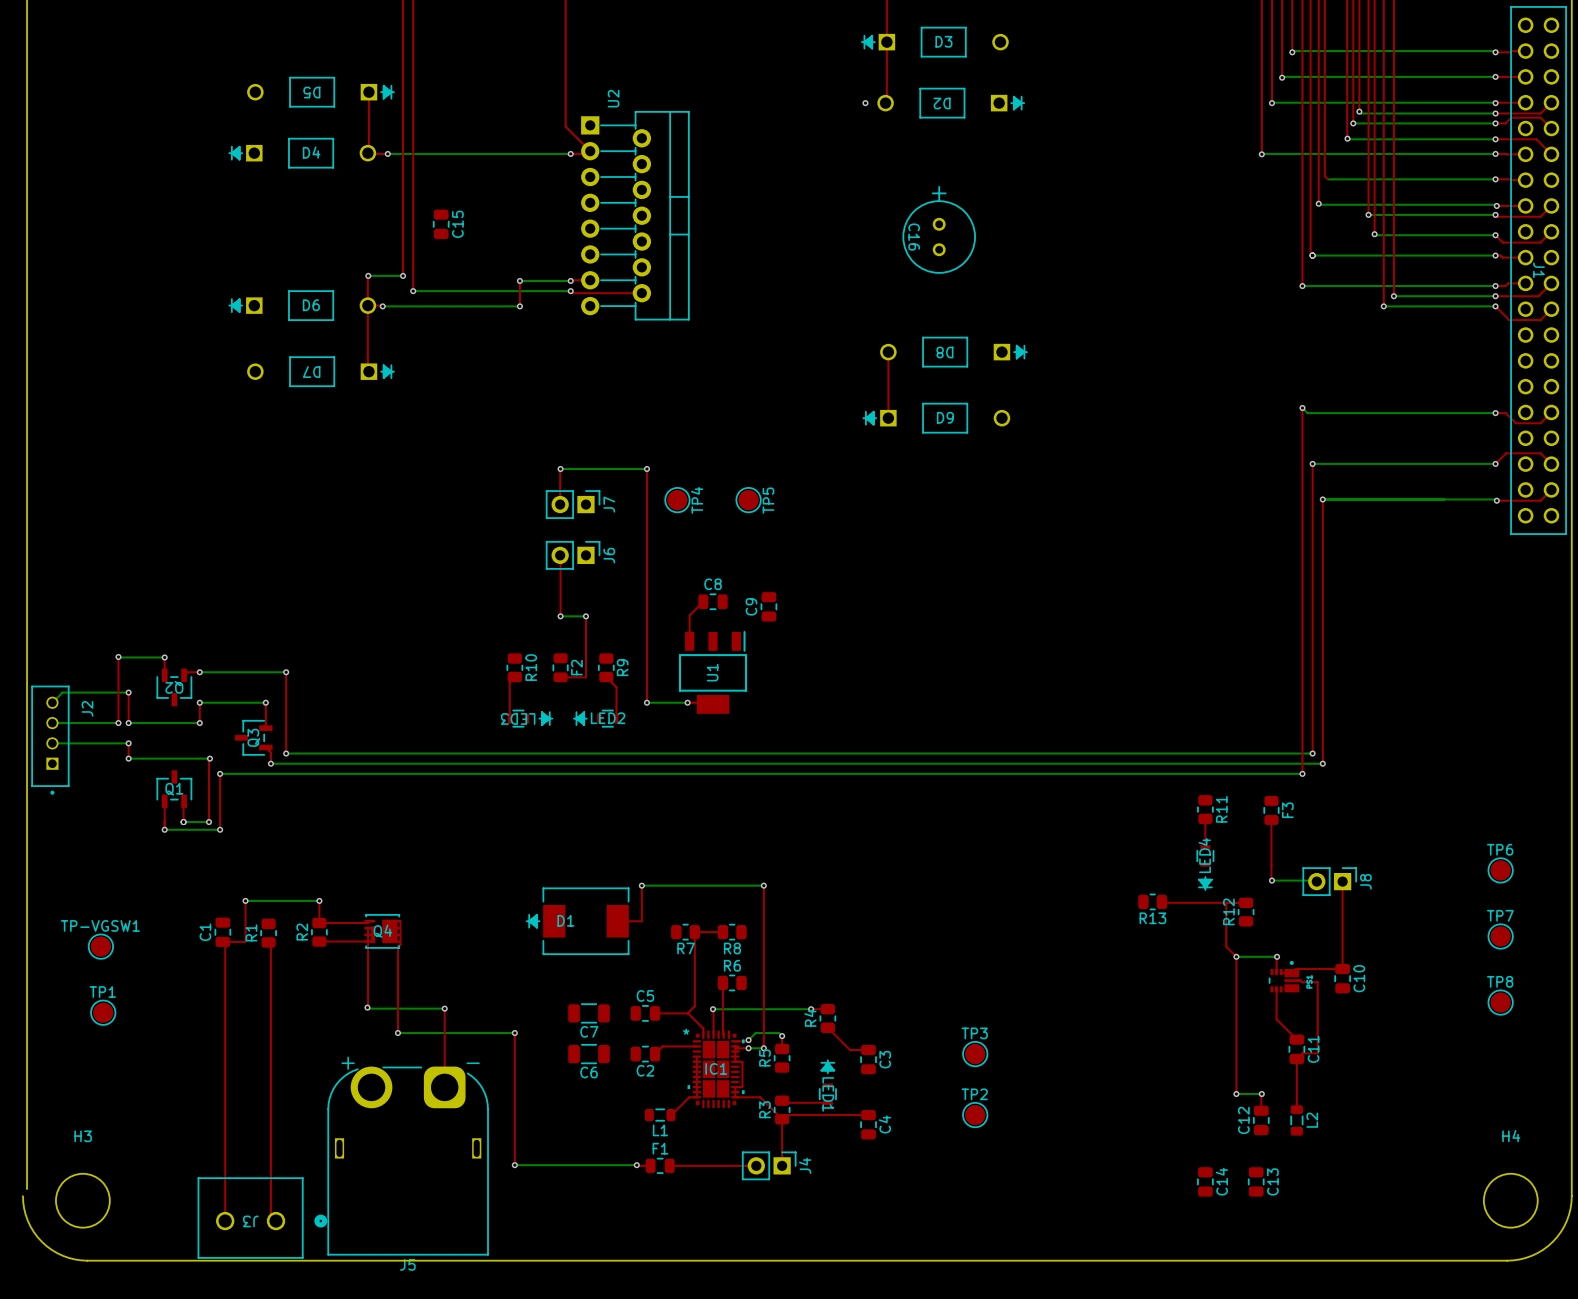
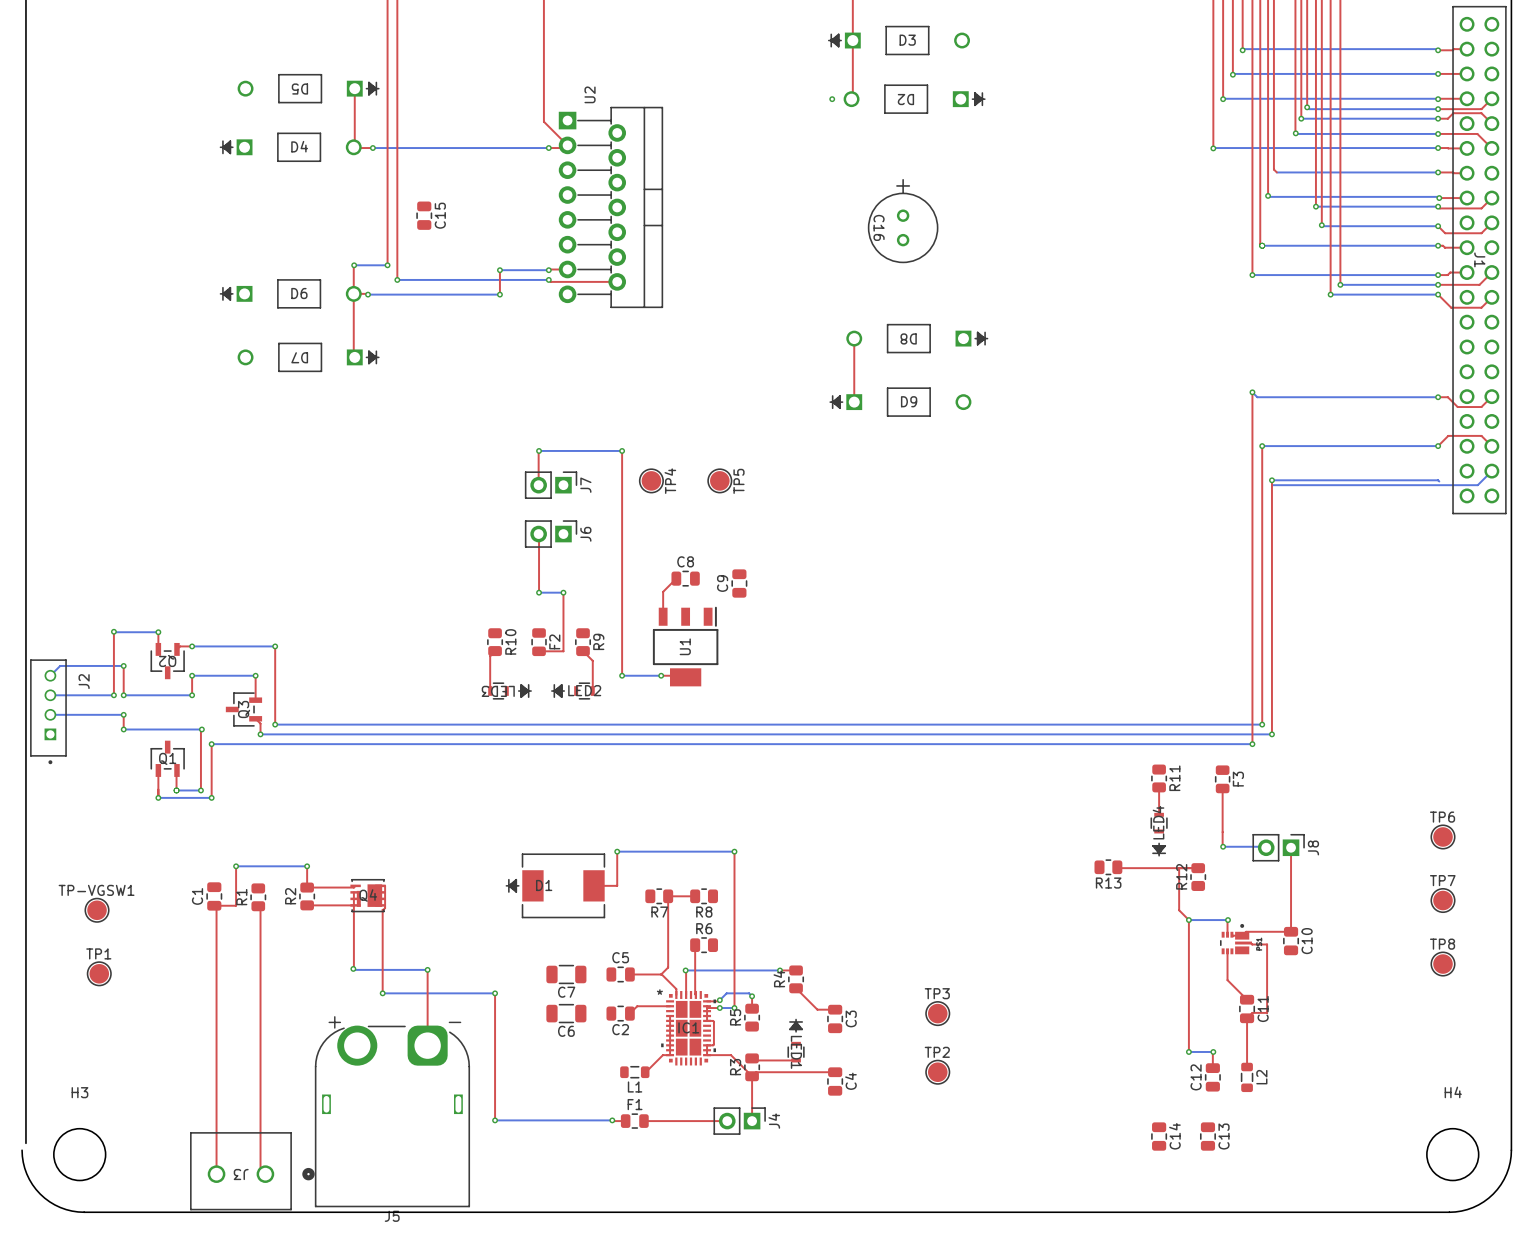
top track: (1551, 489) (1540, 500) (1495, 499) -> none
bottom track: none -> (1491, 471) (1477, 485) (1271, 485)
via: (1496, 500) -> none

